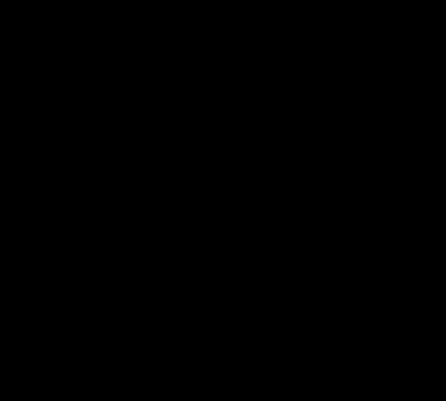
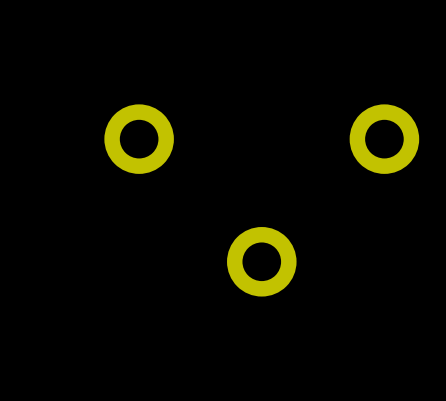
part: none -> (261, 200)

